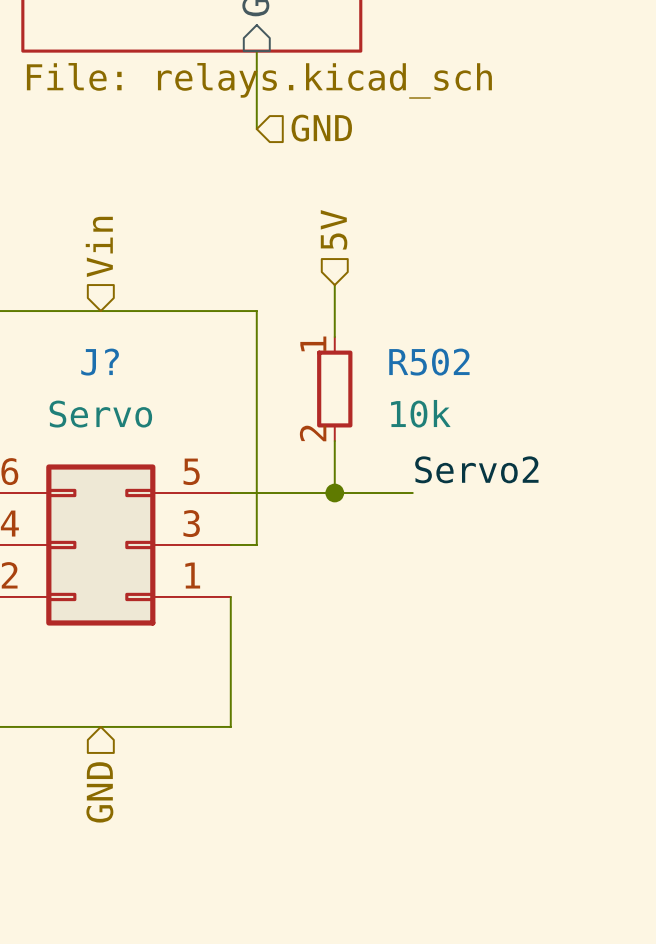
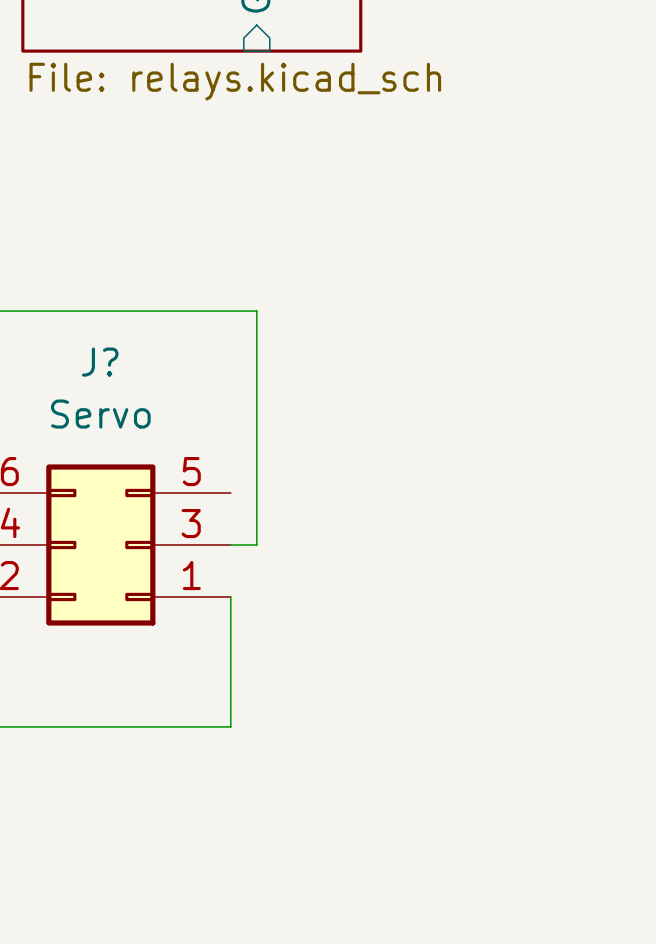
wire: (256, 51) (256, 129) -> none
hierarchical label: GND (321, 128) -> none
hierarchical label: 5V (334, 229) -> none
hierarchical label: Vin (99, 246) -> none
wire: (334, 285) (334, 337) -> none
R502: 10k (334, 389) -> none
wire: (334, 441) (334, 493) -> none
label: Servo2 (476, 469) -> none
wire: (230, 493) (412, 493) -> none
junction: (334, 493) -> none
hierarchical label: GND (99, 792) -> none

